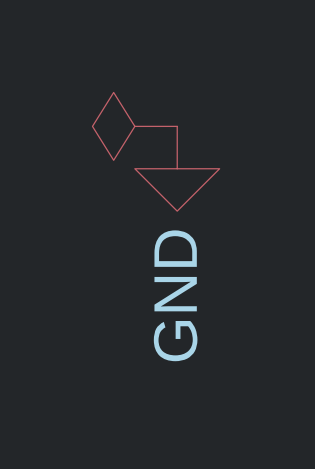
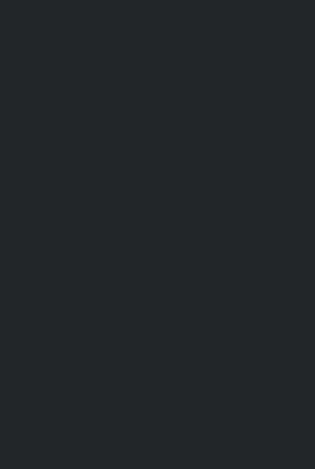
power symbol: (134, 126) -> none
power symbol: GND (177, 168) -> none

